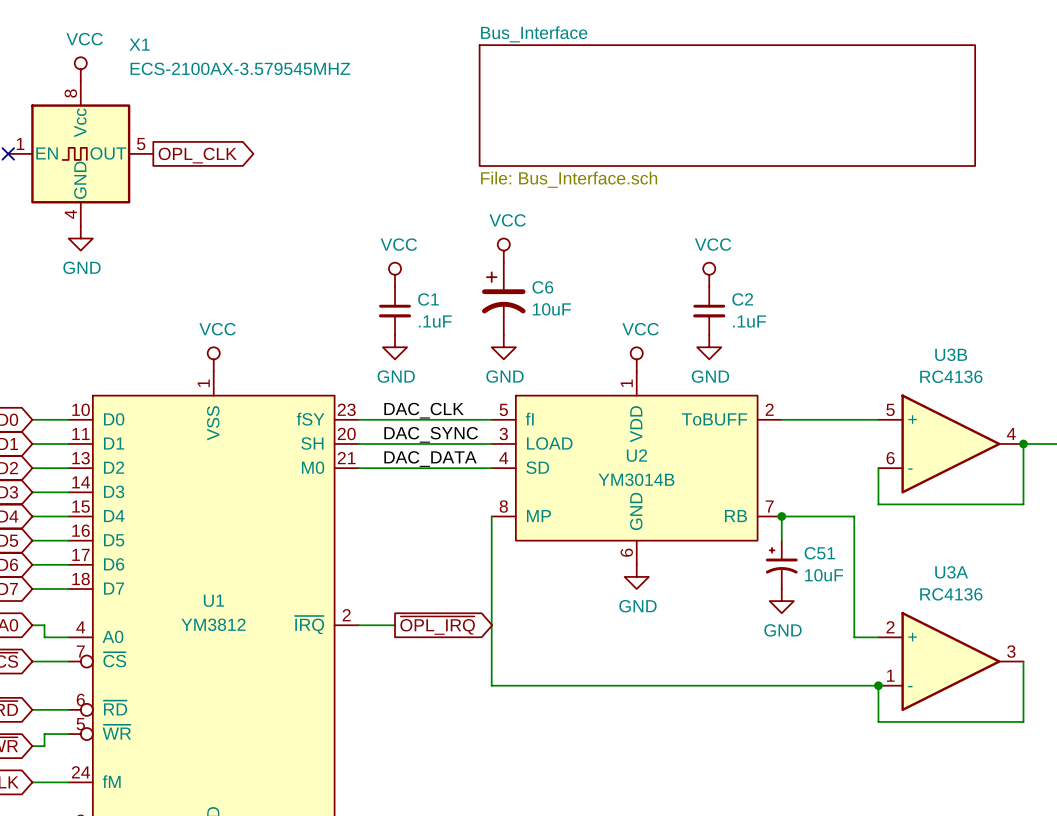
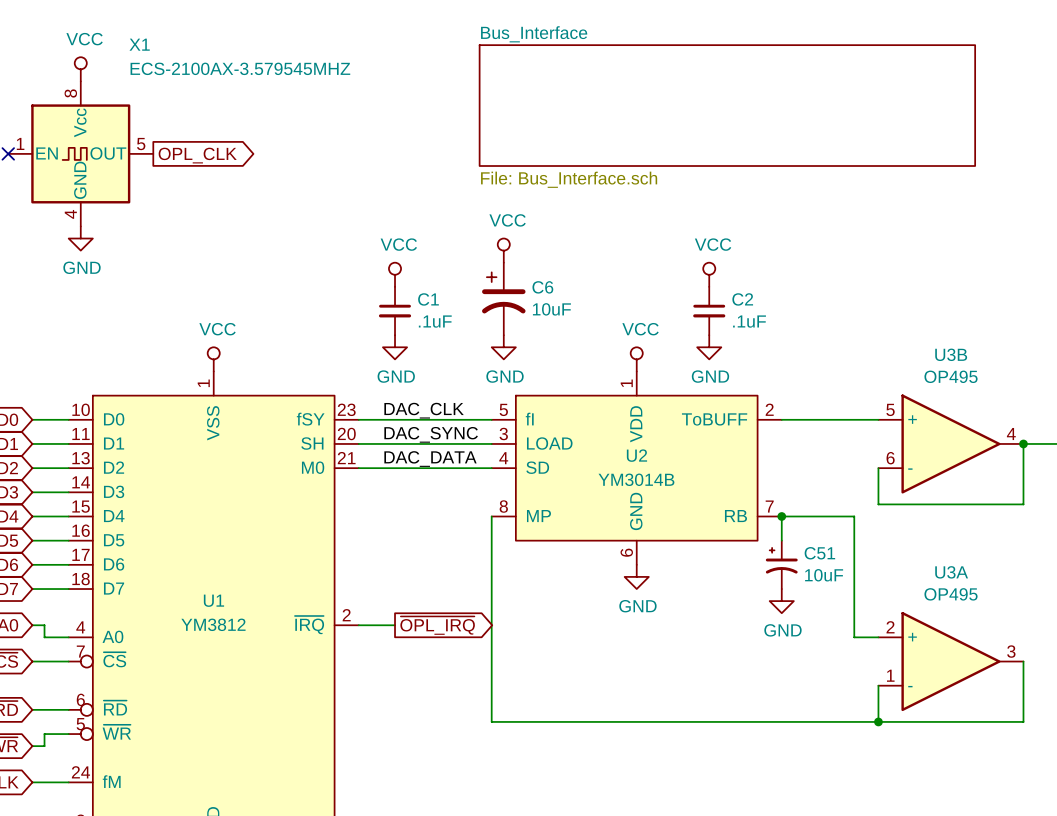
U3B value: RC4136 (951, 376) -> OP495 (951, 376)
U3A value: RC4136 (951, 594) -> OP495 (951, 594)
wire: (491, 685) (878, 685) -> (491, 685) (491, 721) (878, 721)
junction position: (878, 685) -> (878, 721)

